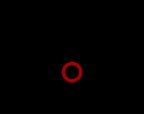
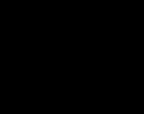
drawing: [61, 61, 83, 83] -> none

